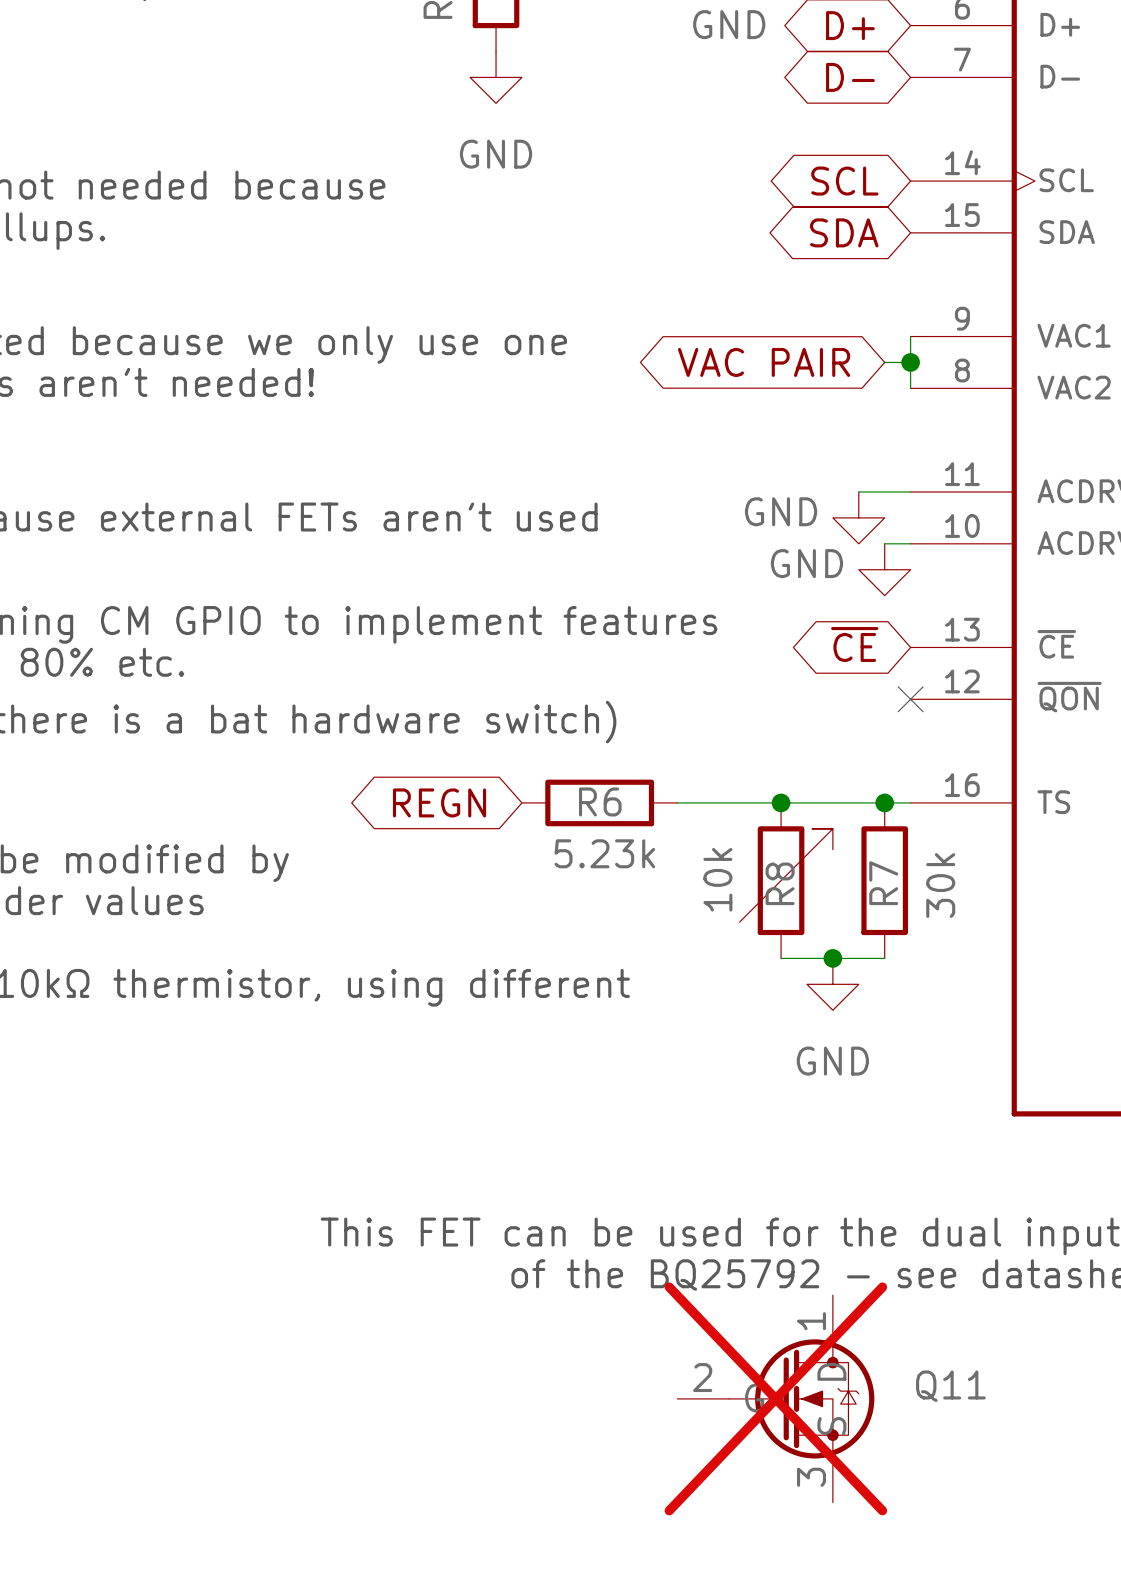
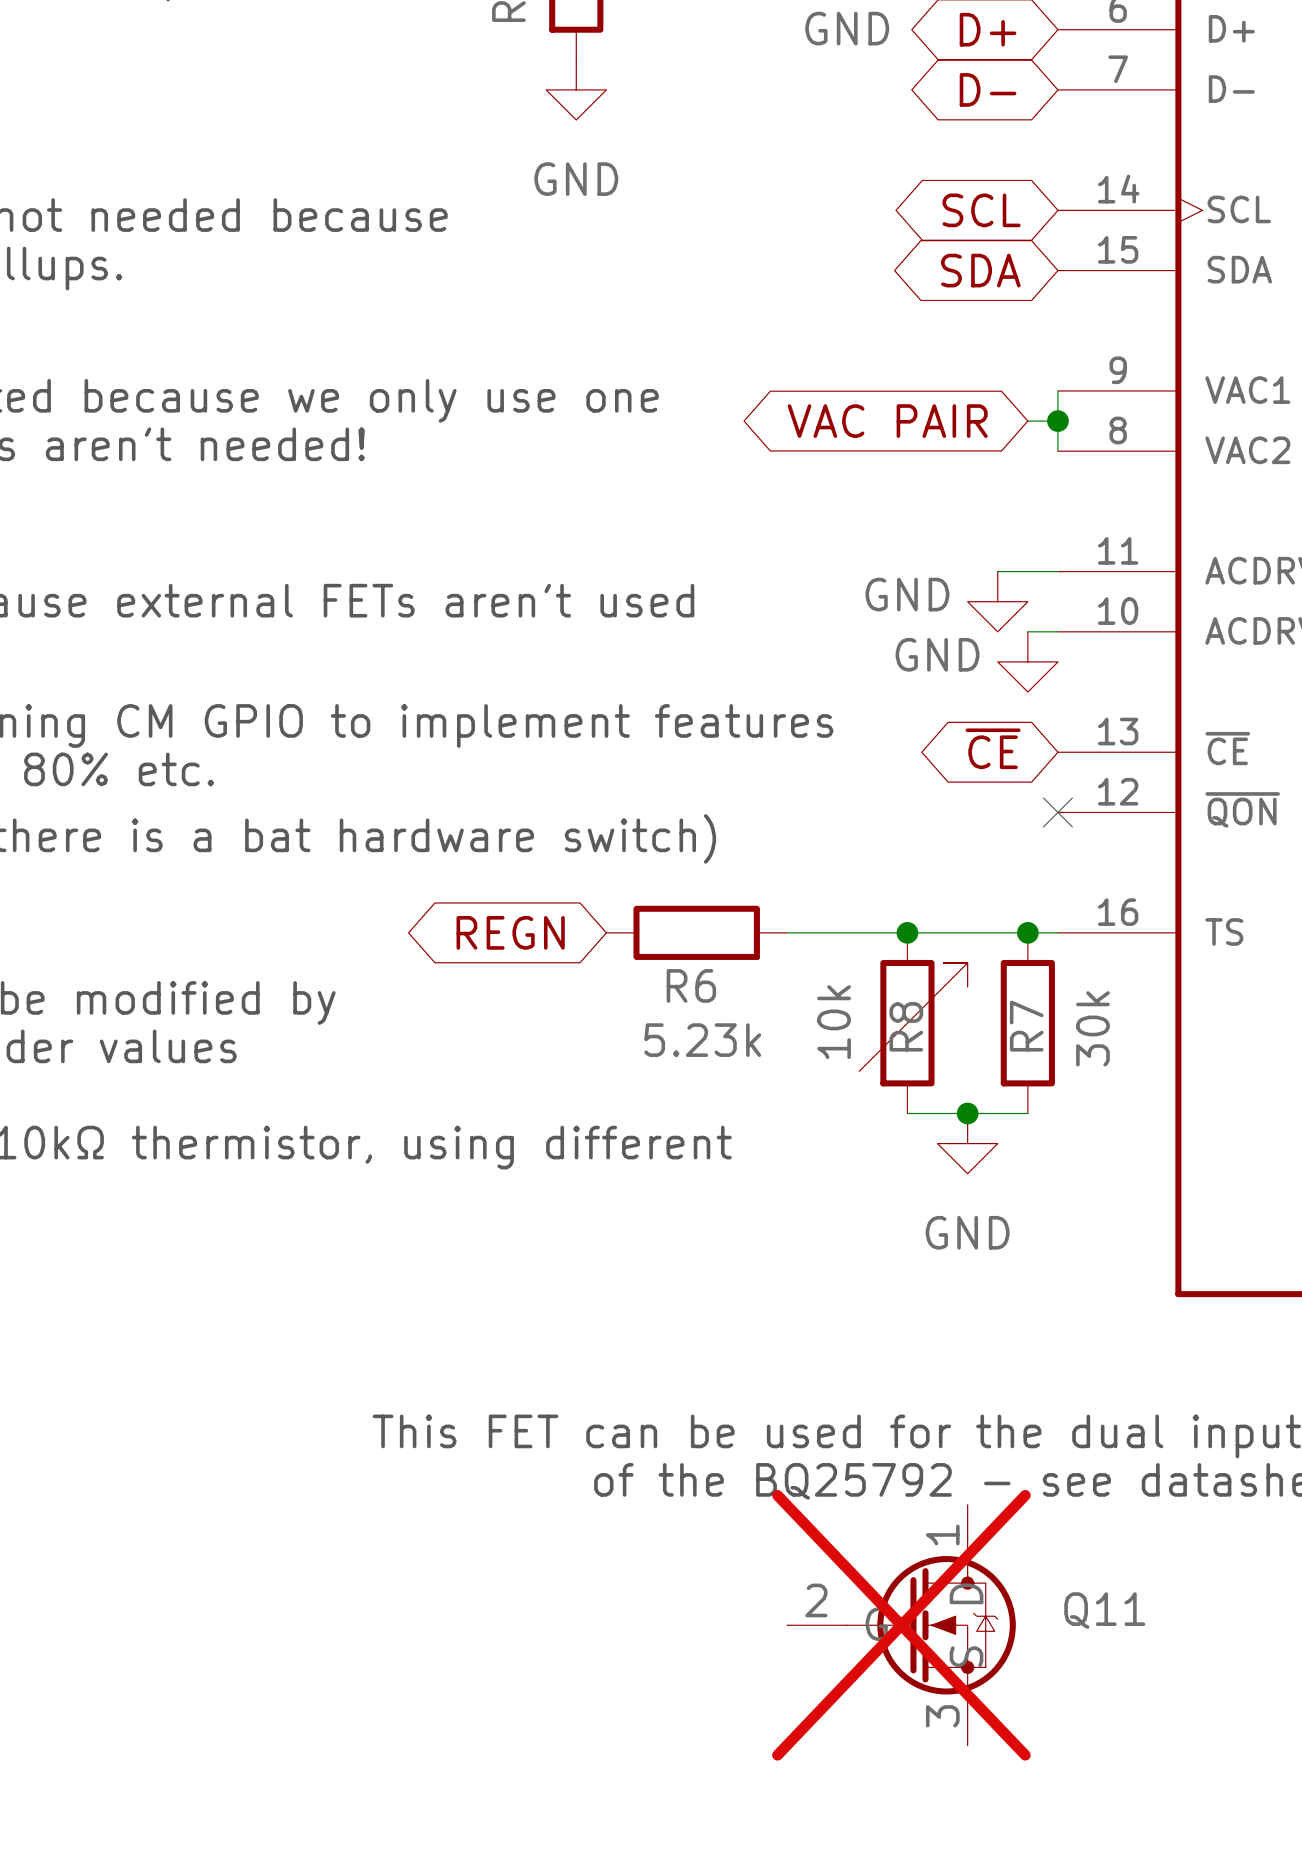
R6 name position: R6 (600, 801) -> R6 (691, 985)
R6 value position: 5.23k (604, 853) -> 5.23k (702, 1040)

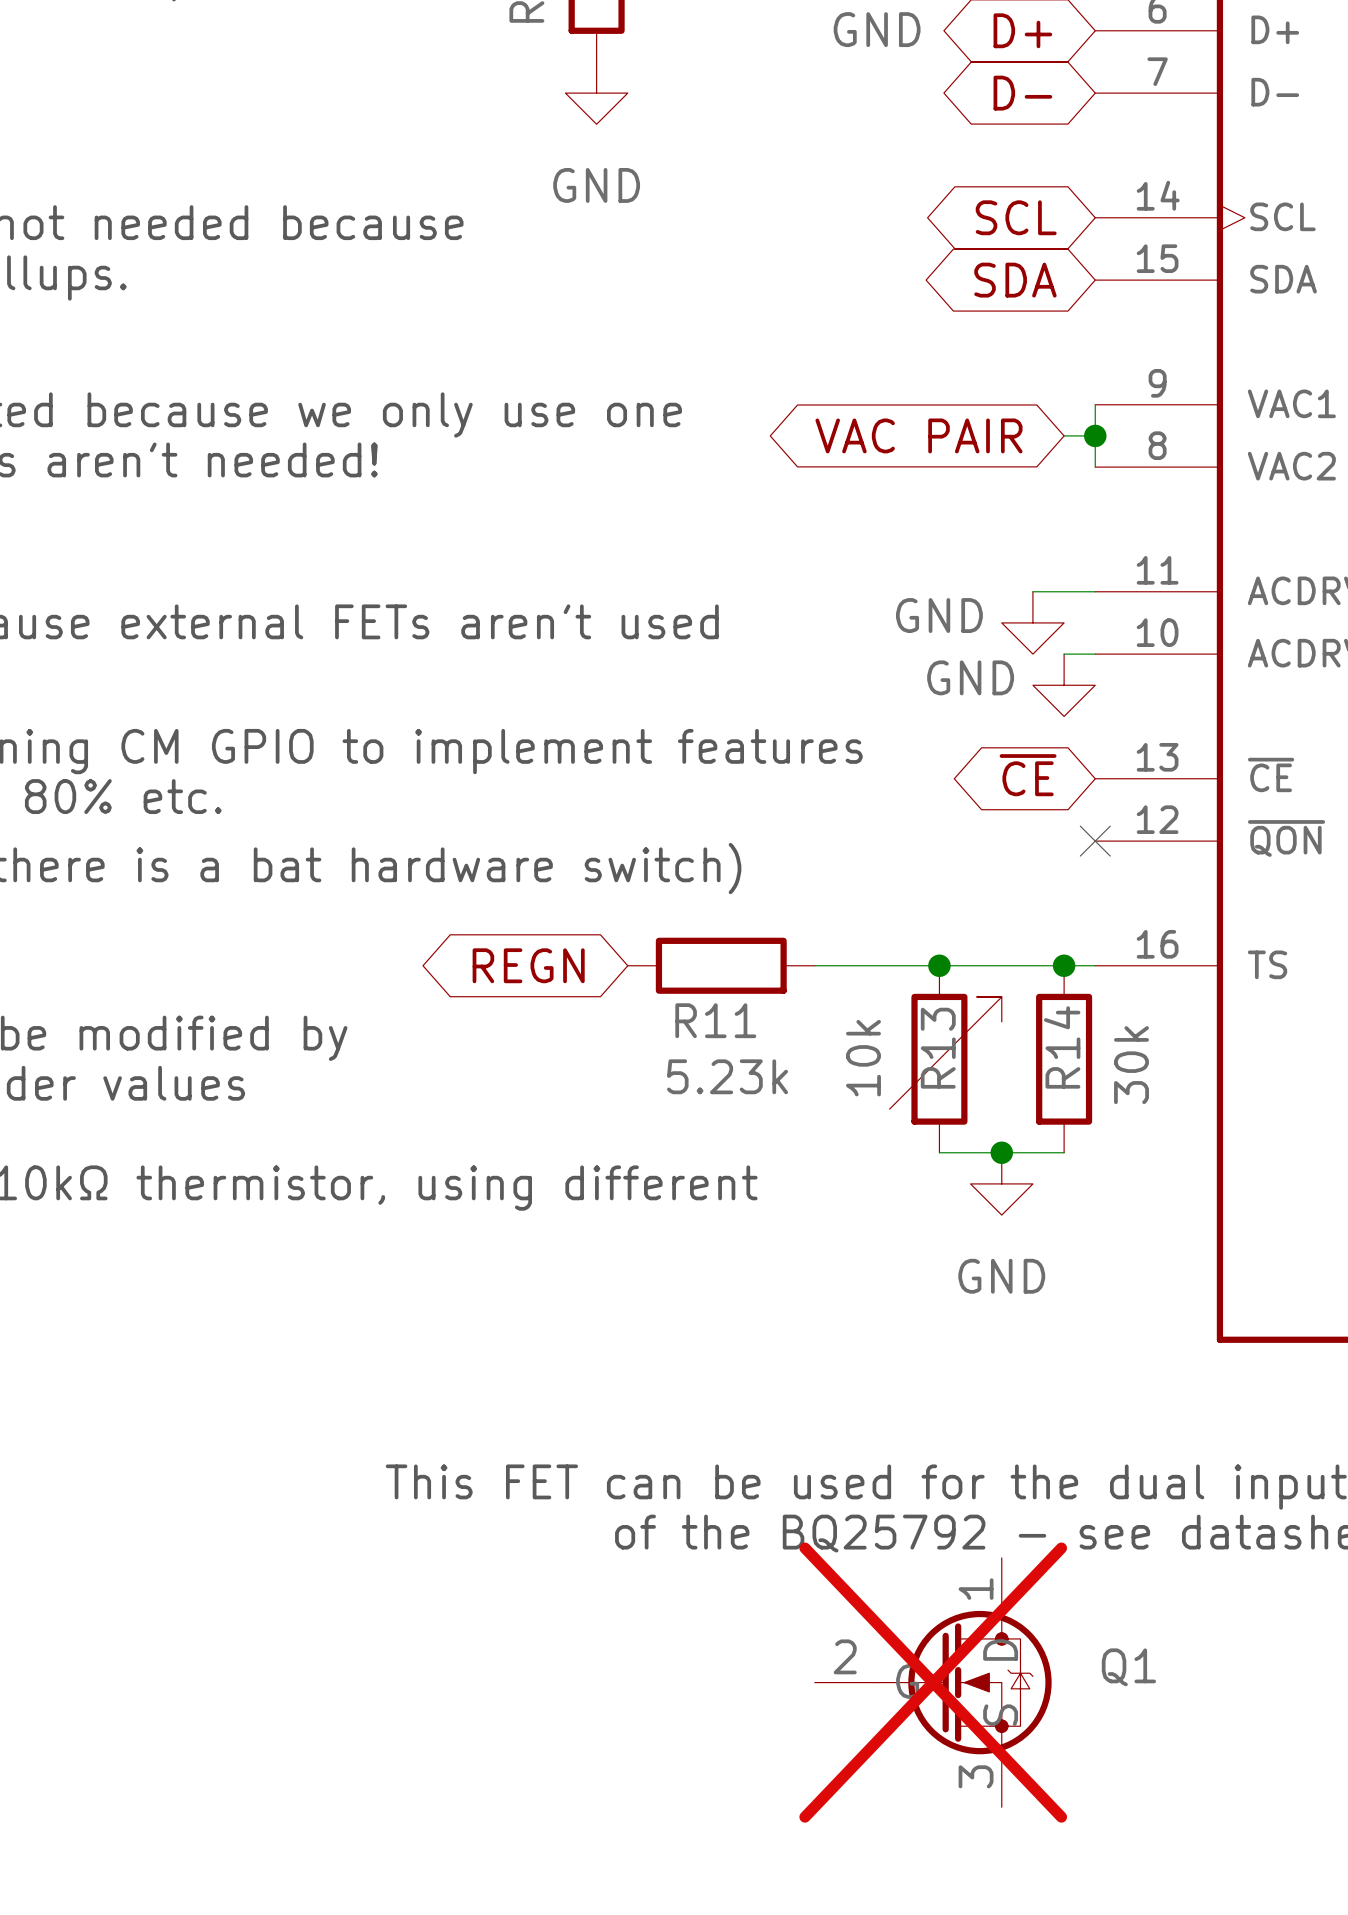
R6 name: R6 (691, 985) -> R11 (715, 1020)
R8 name: R8 (906, 1026) -> R13 (938, 1048)
R7 name: R7 (1026, 1026) -> R14 (1062, 1047)
Q11 name: Q11 (1104, 1610) -> Q1 (1128, 1667)

